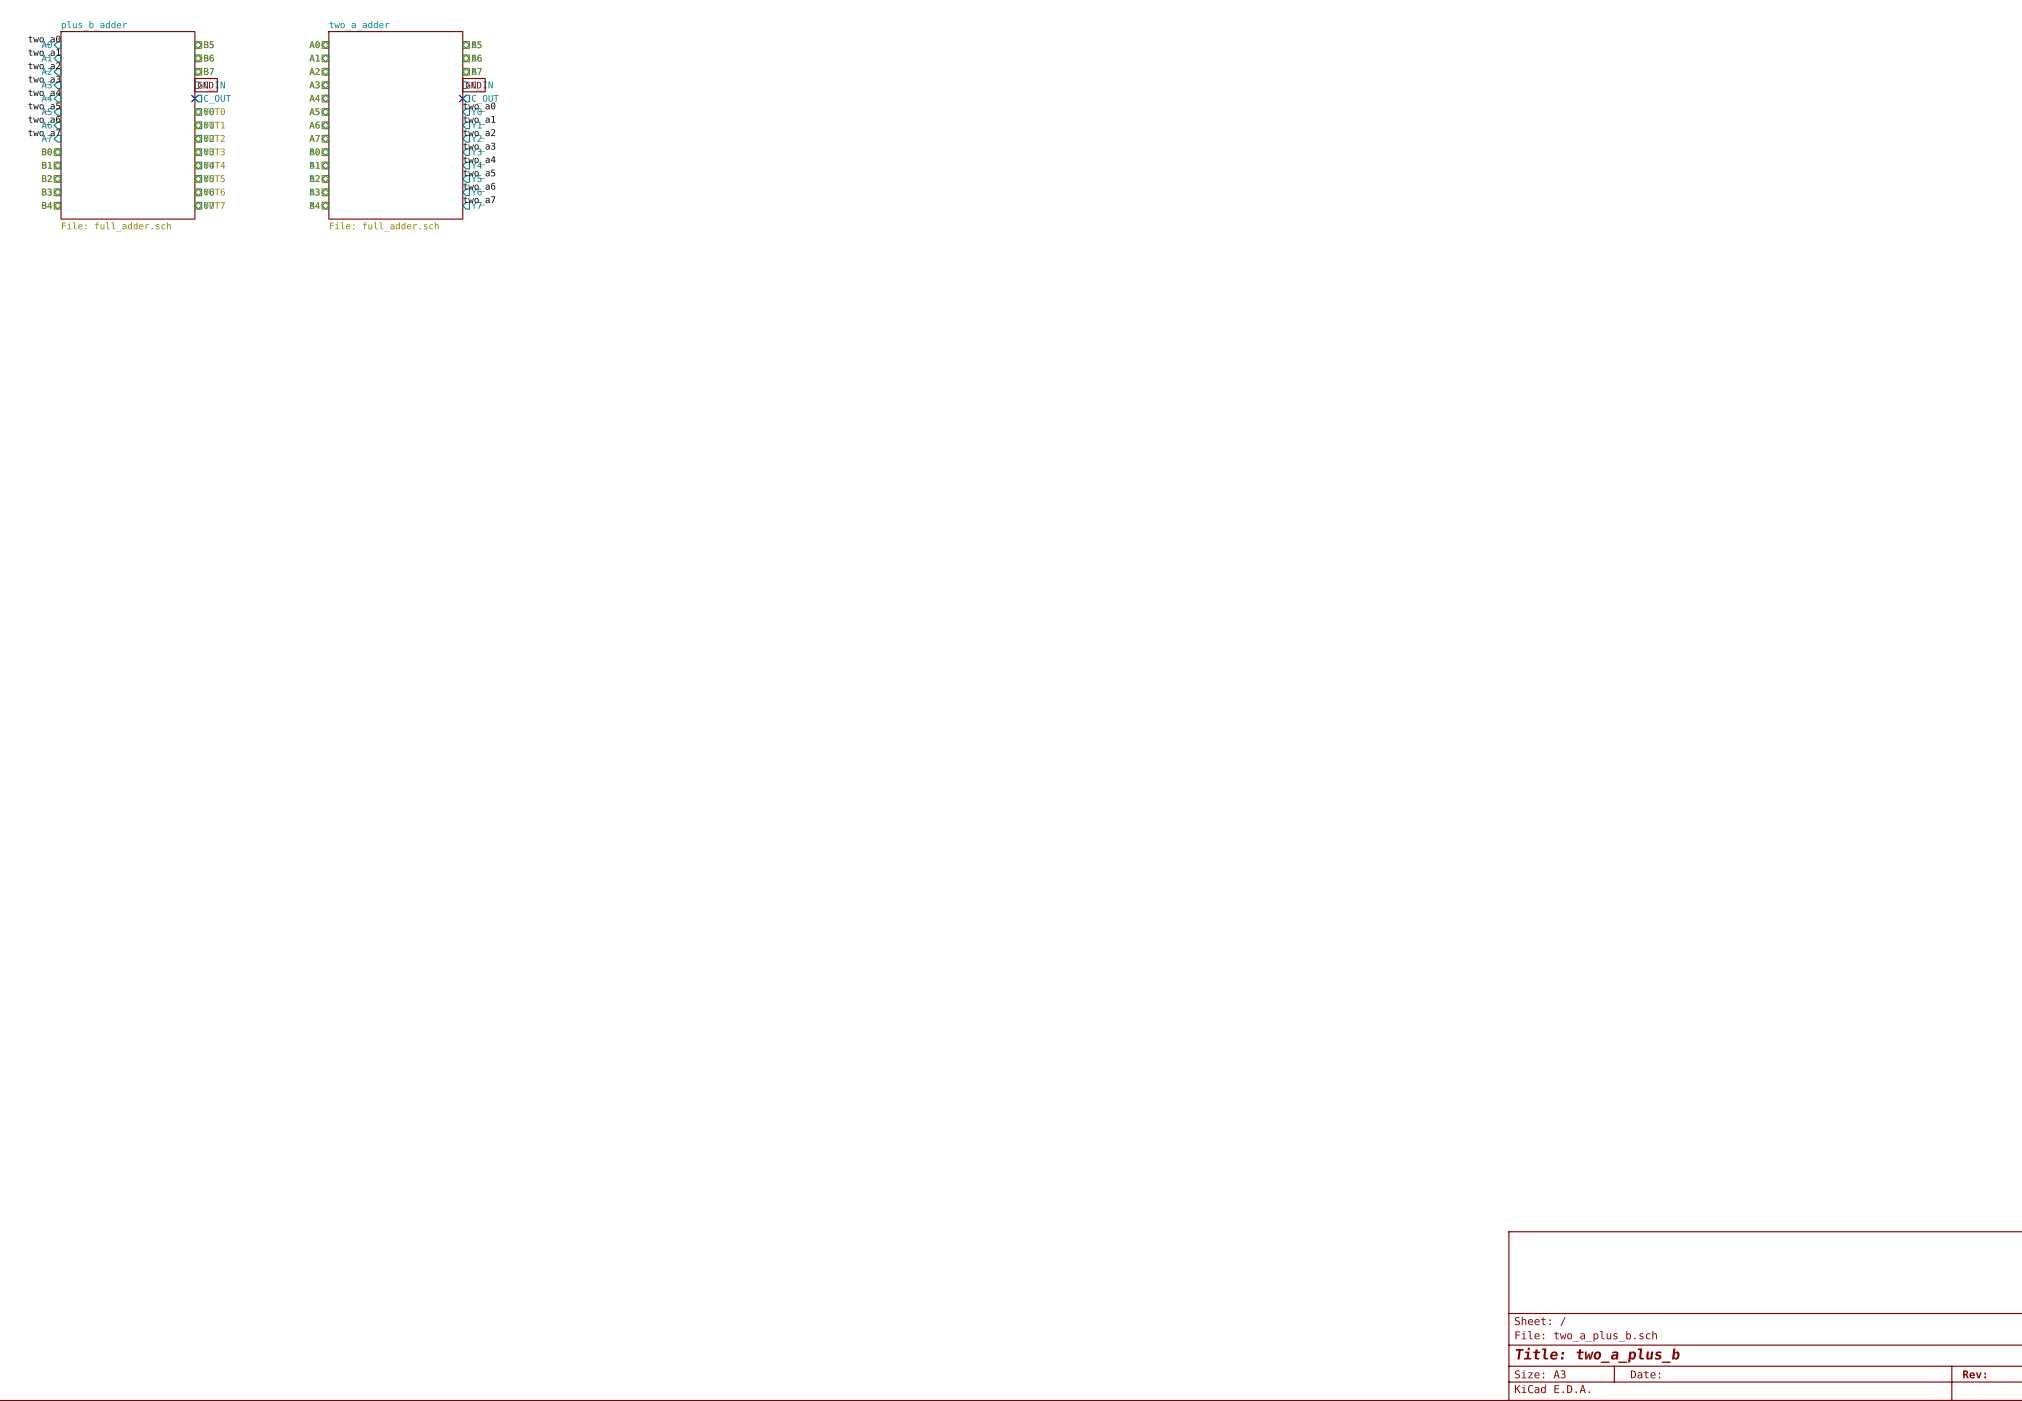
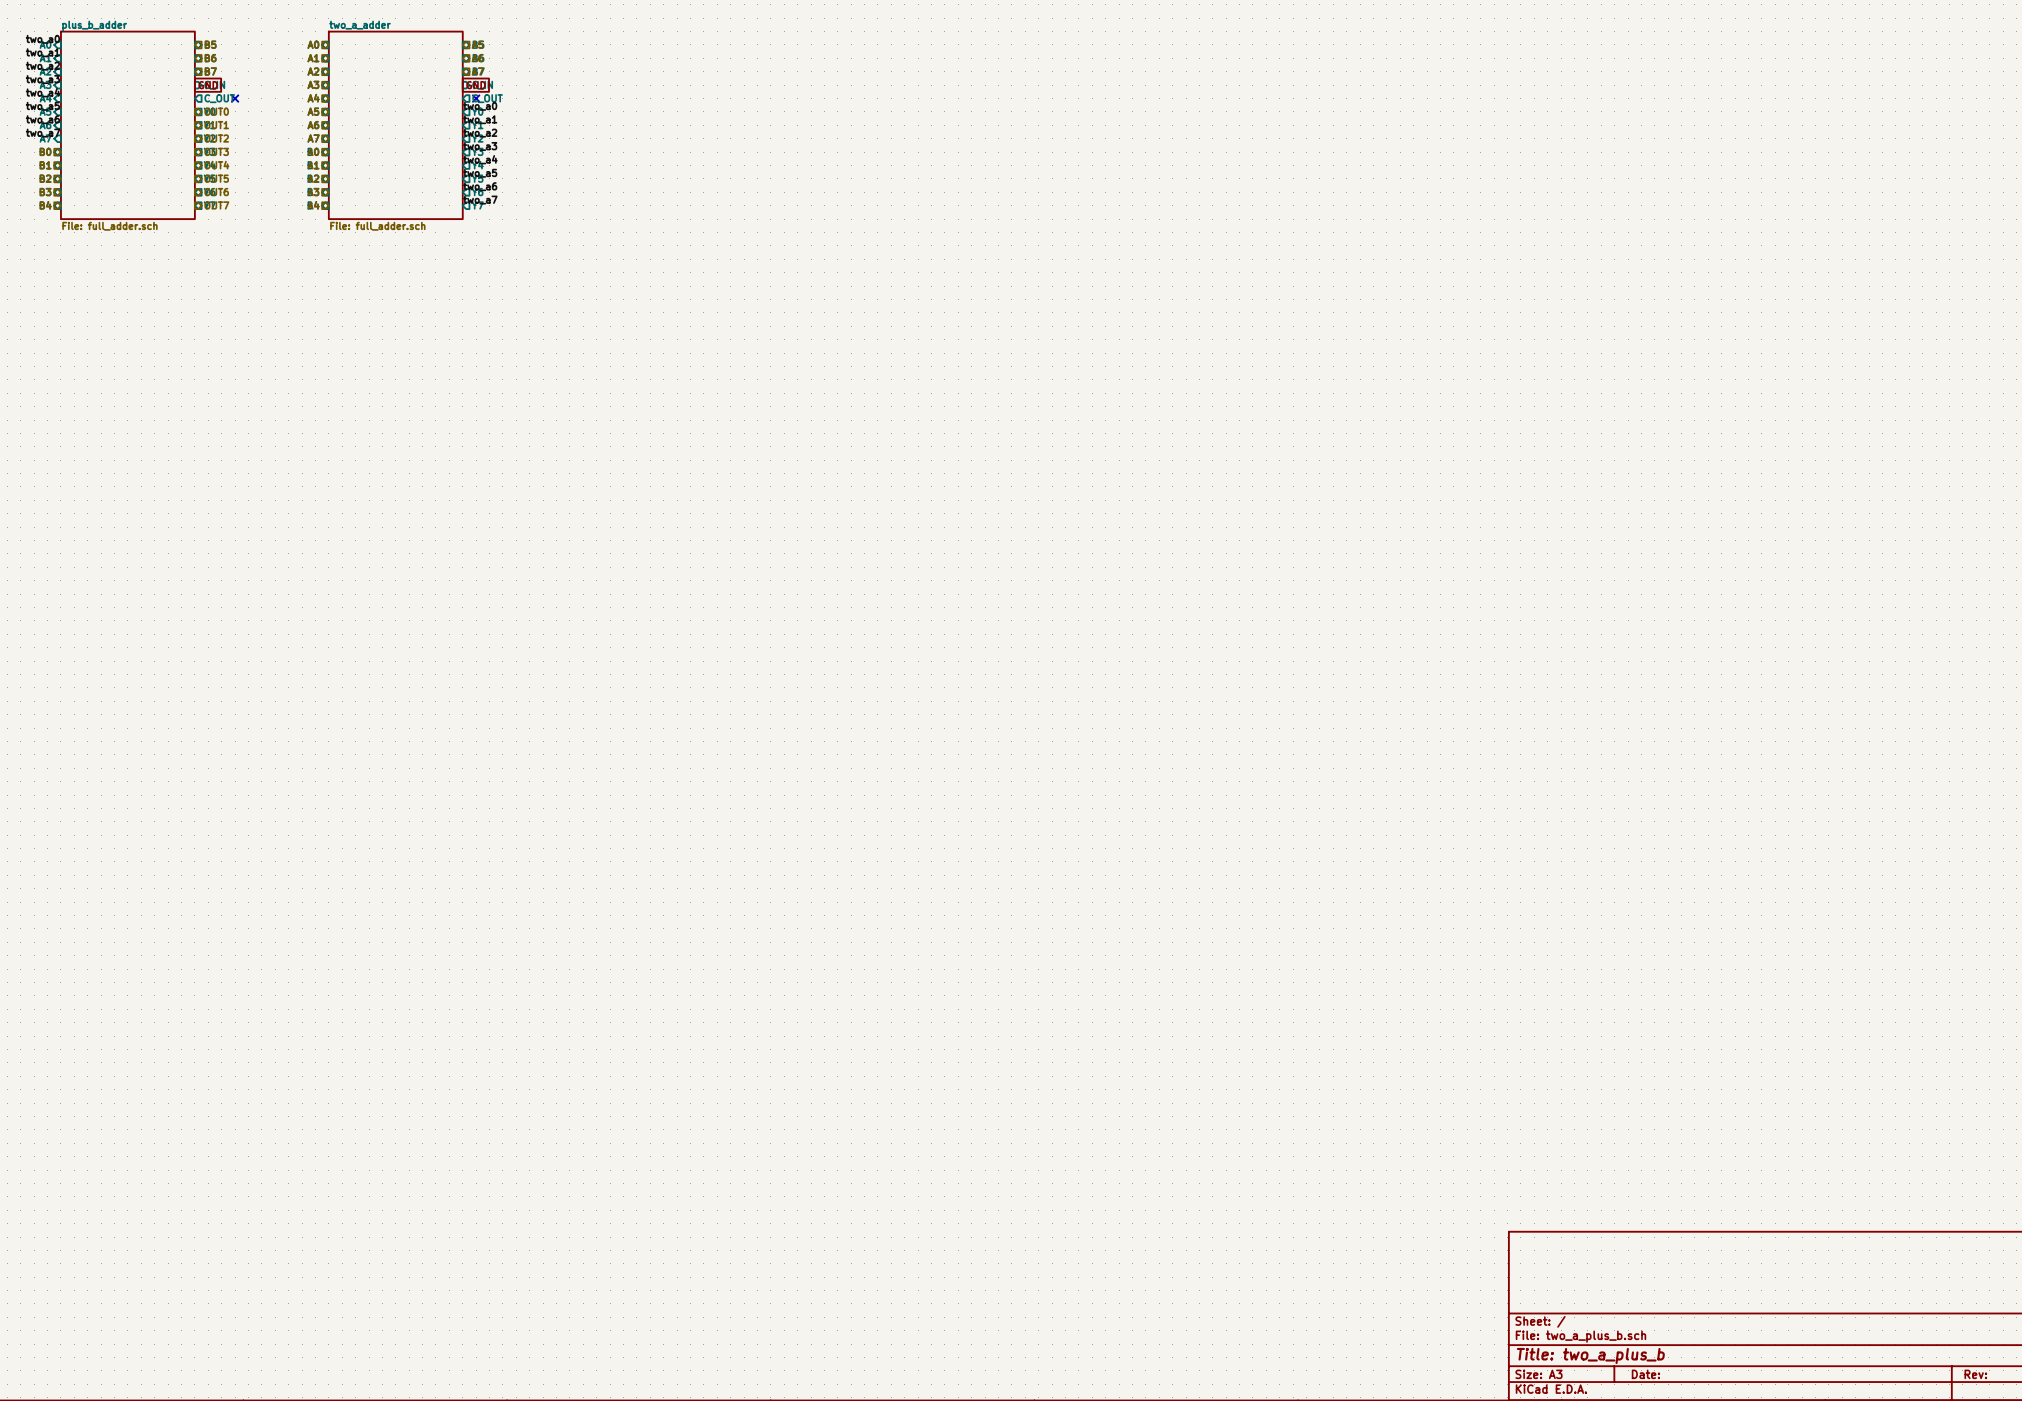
no-connect mark: (194, 98) -> none
no-connect mark: none -> (235, 98)
no-connect mark position: (462, 98) -> (476, 98)

